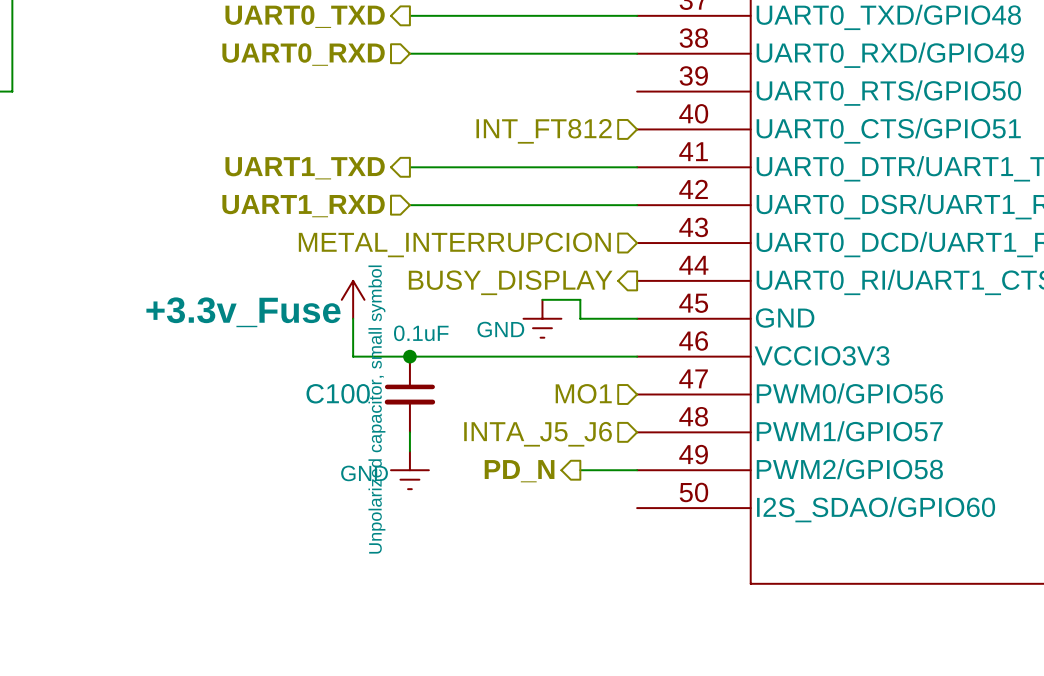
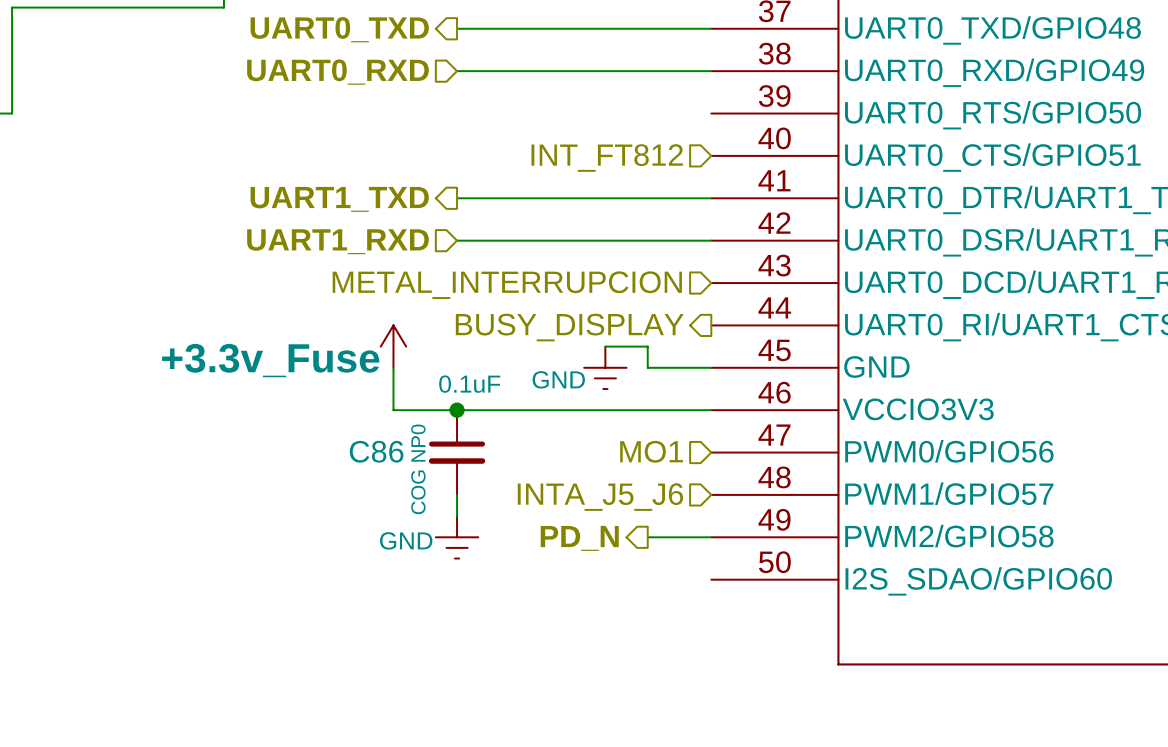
C100 name: C100 (338, 393) -> C86 (376, 451)
C100 text: Unpolarized capacitor, small symbol (376, 409) -> COG NP0 (418, 469)

